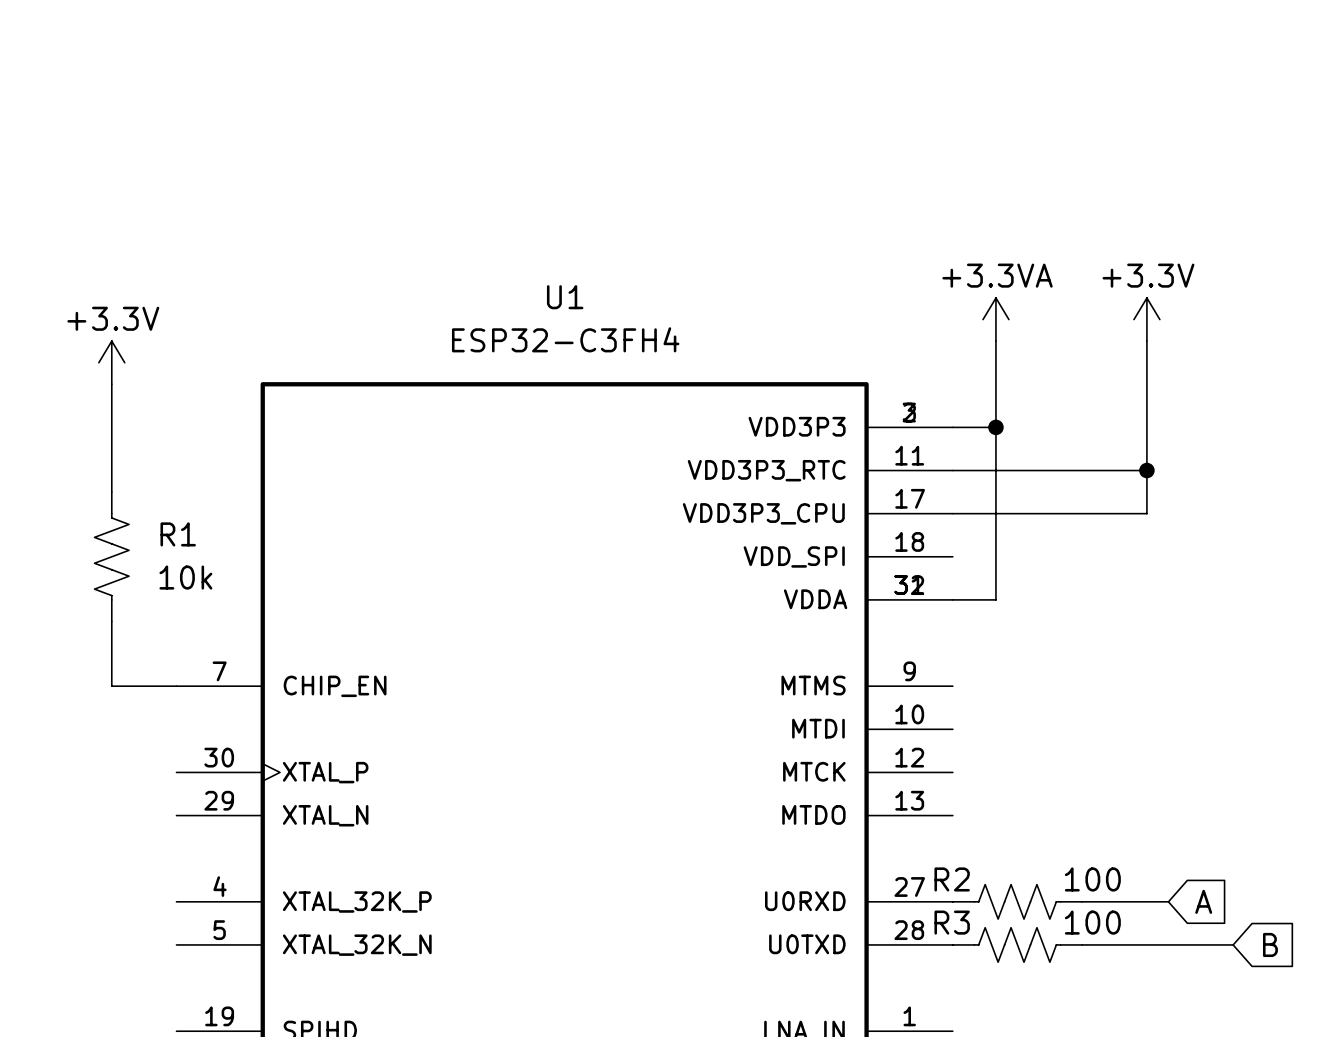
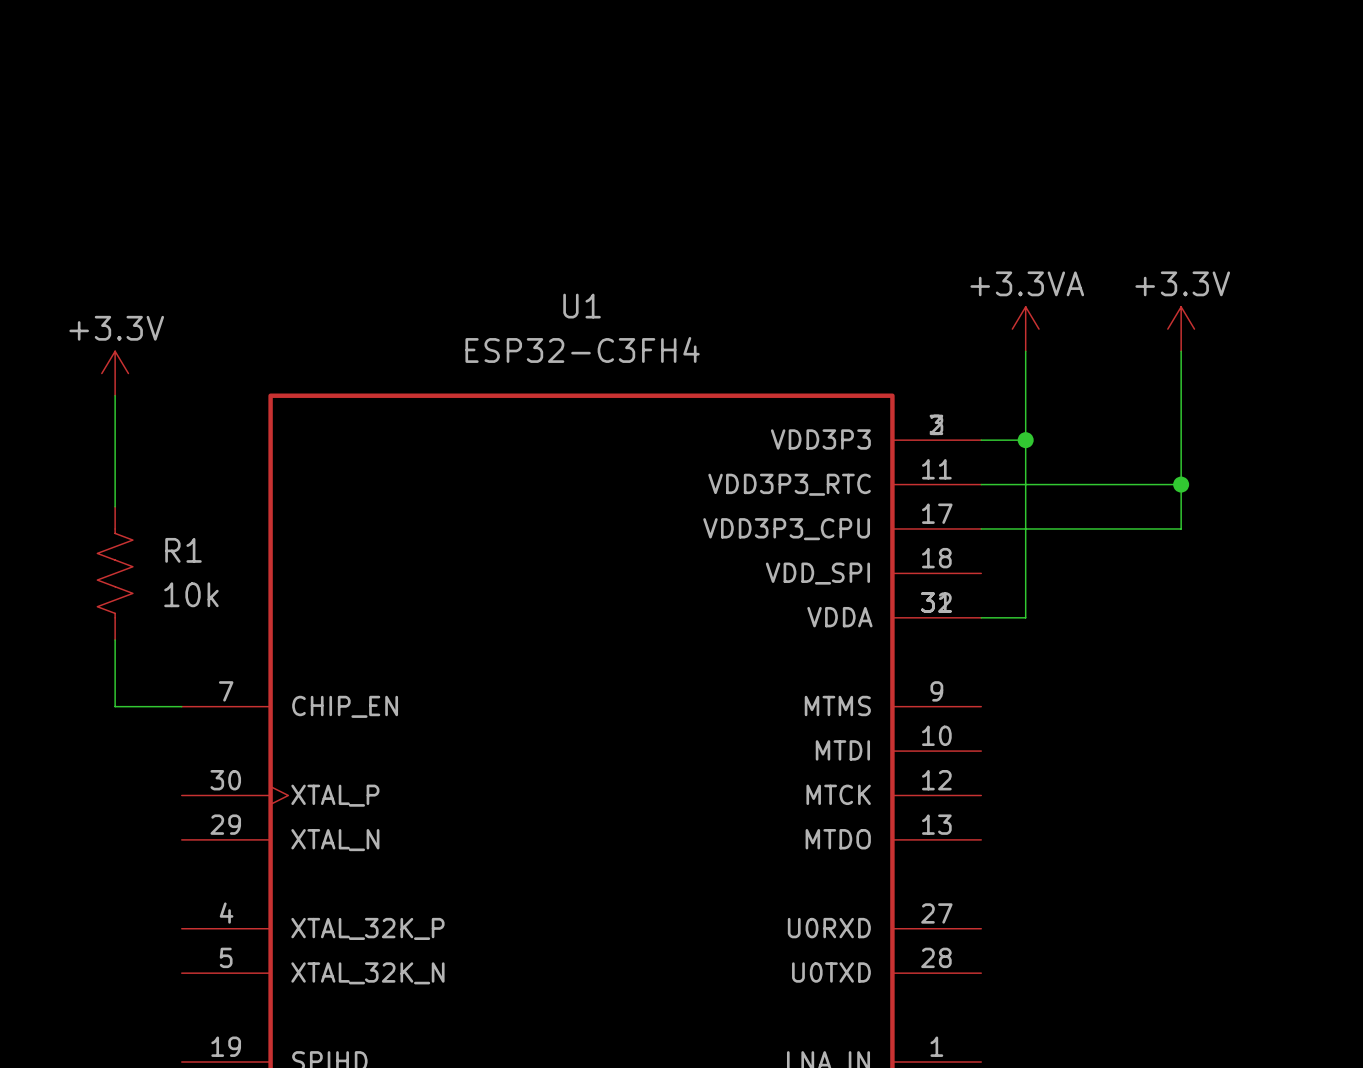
R2: 100 (1017, 901) -> none
wire: (1082, 901) (1168, 901) -> none
global label: A (1203, 901) -> none
R3: 100 (1017, 944) -> none
wire: (1082, 944) (1233, 944) -> none
global label: B (1270, 944) -> none

